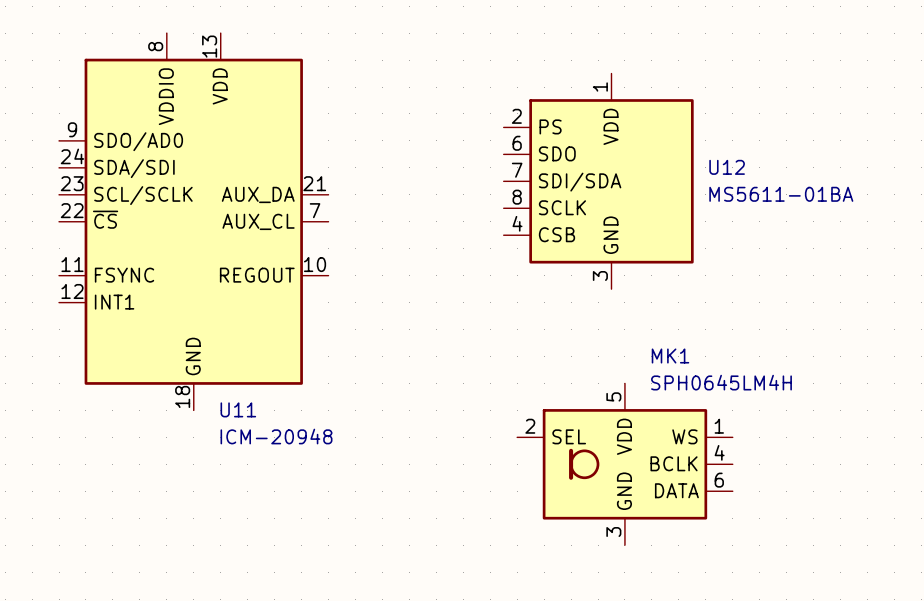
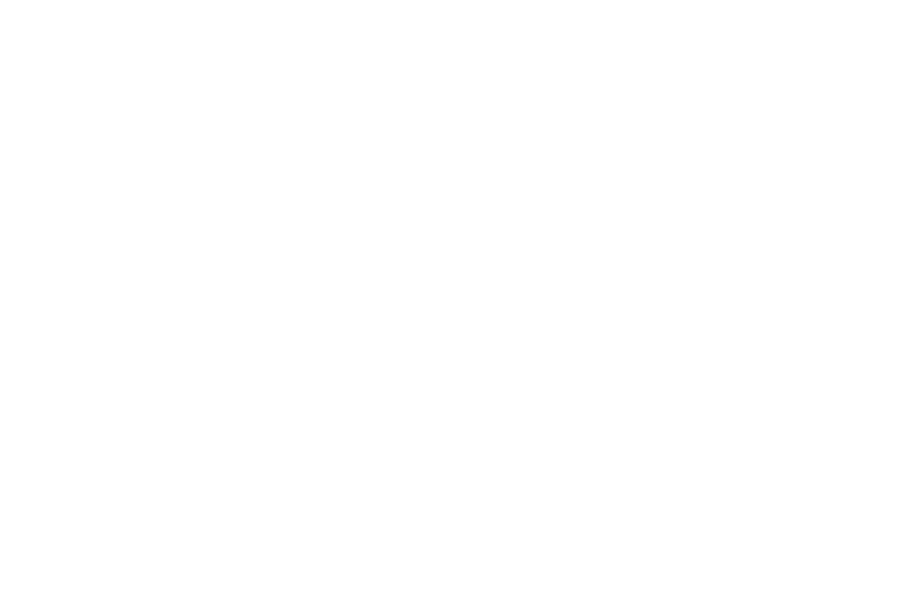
U12: MS5611-01BA (598, 181) -> none
U11: ICM-20948 (193, 221) -> none
MK1: SPH0645LM4H (624, 464) -> none

